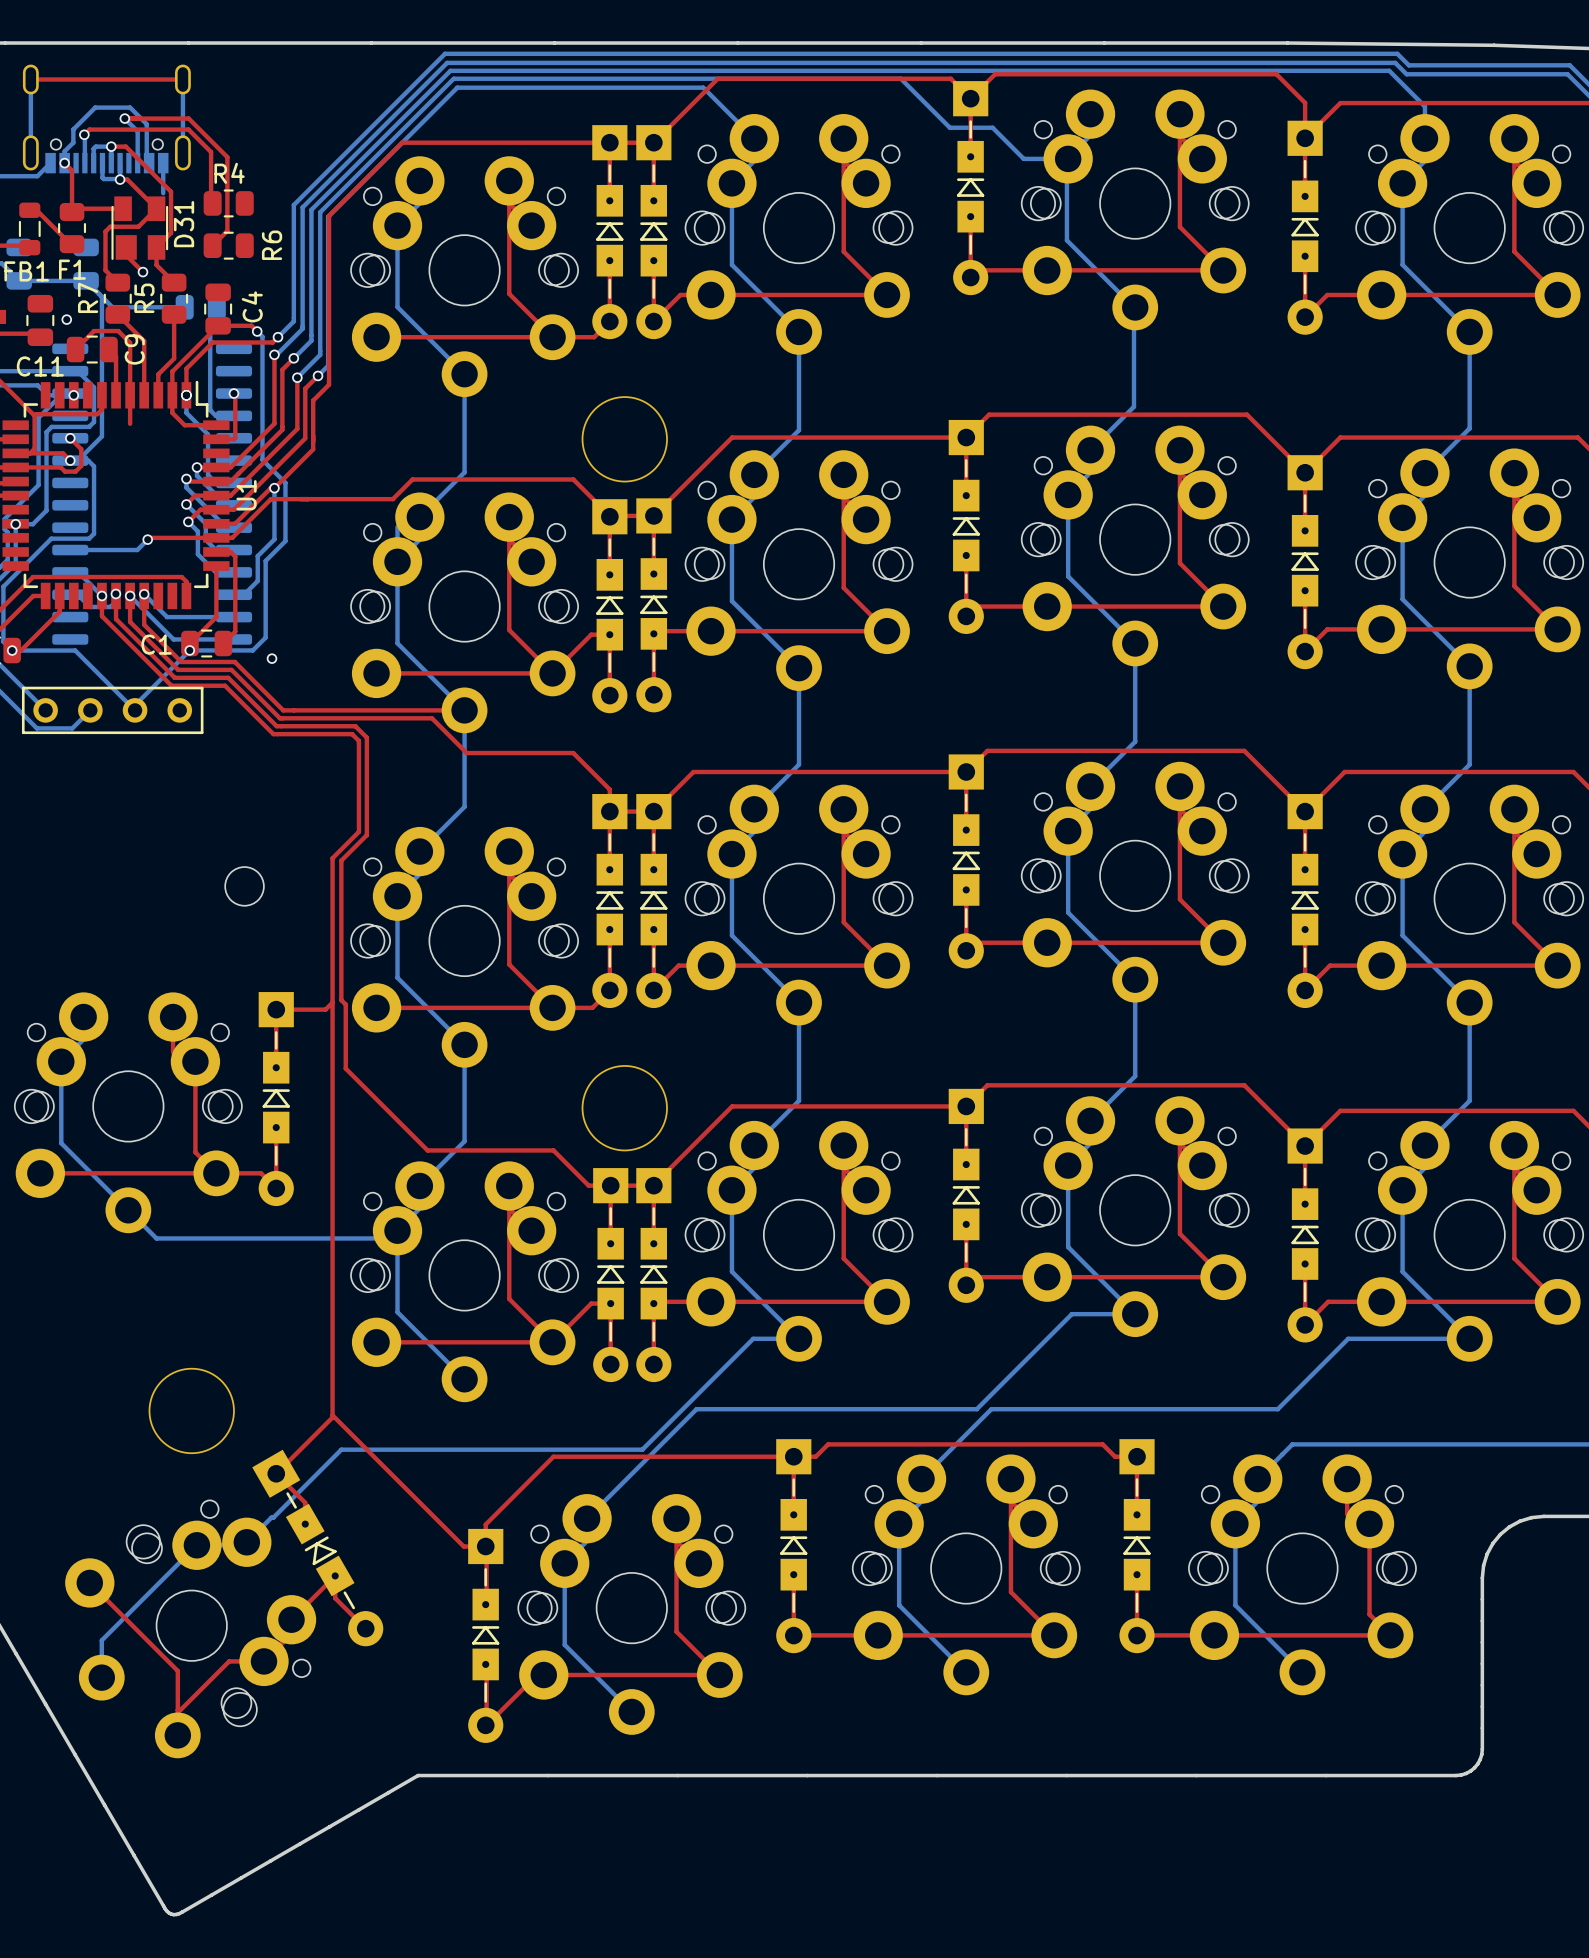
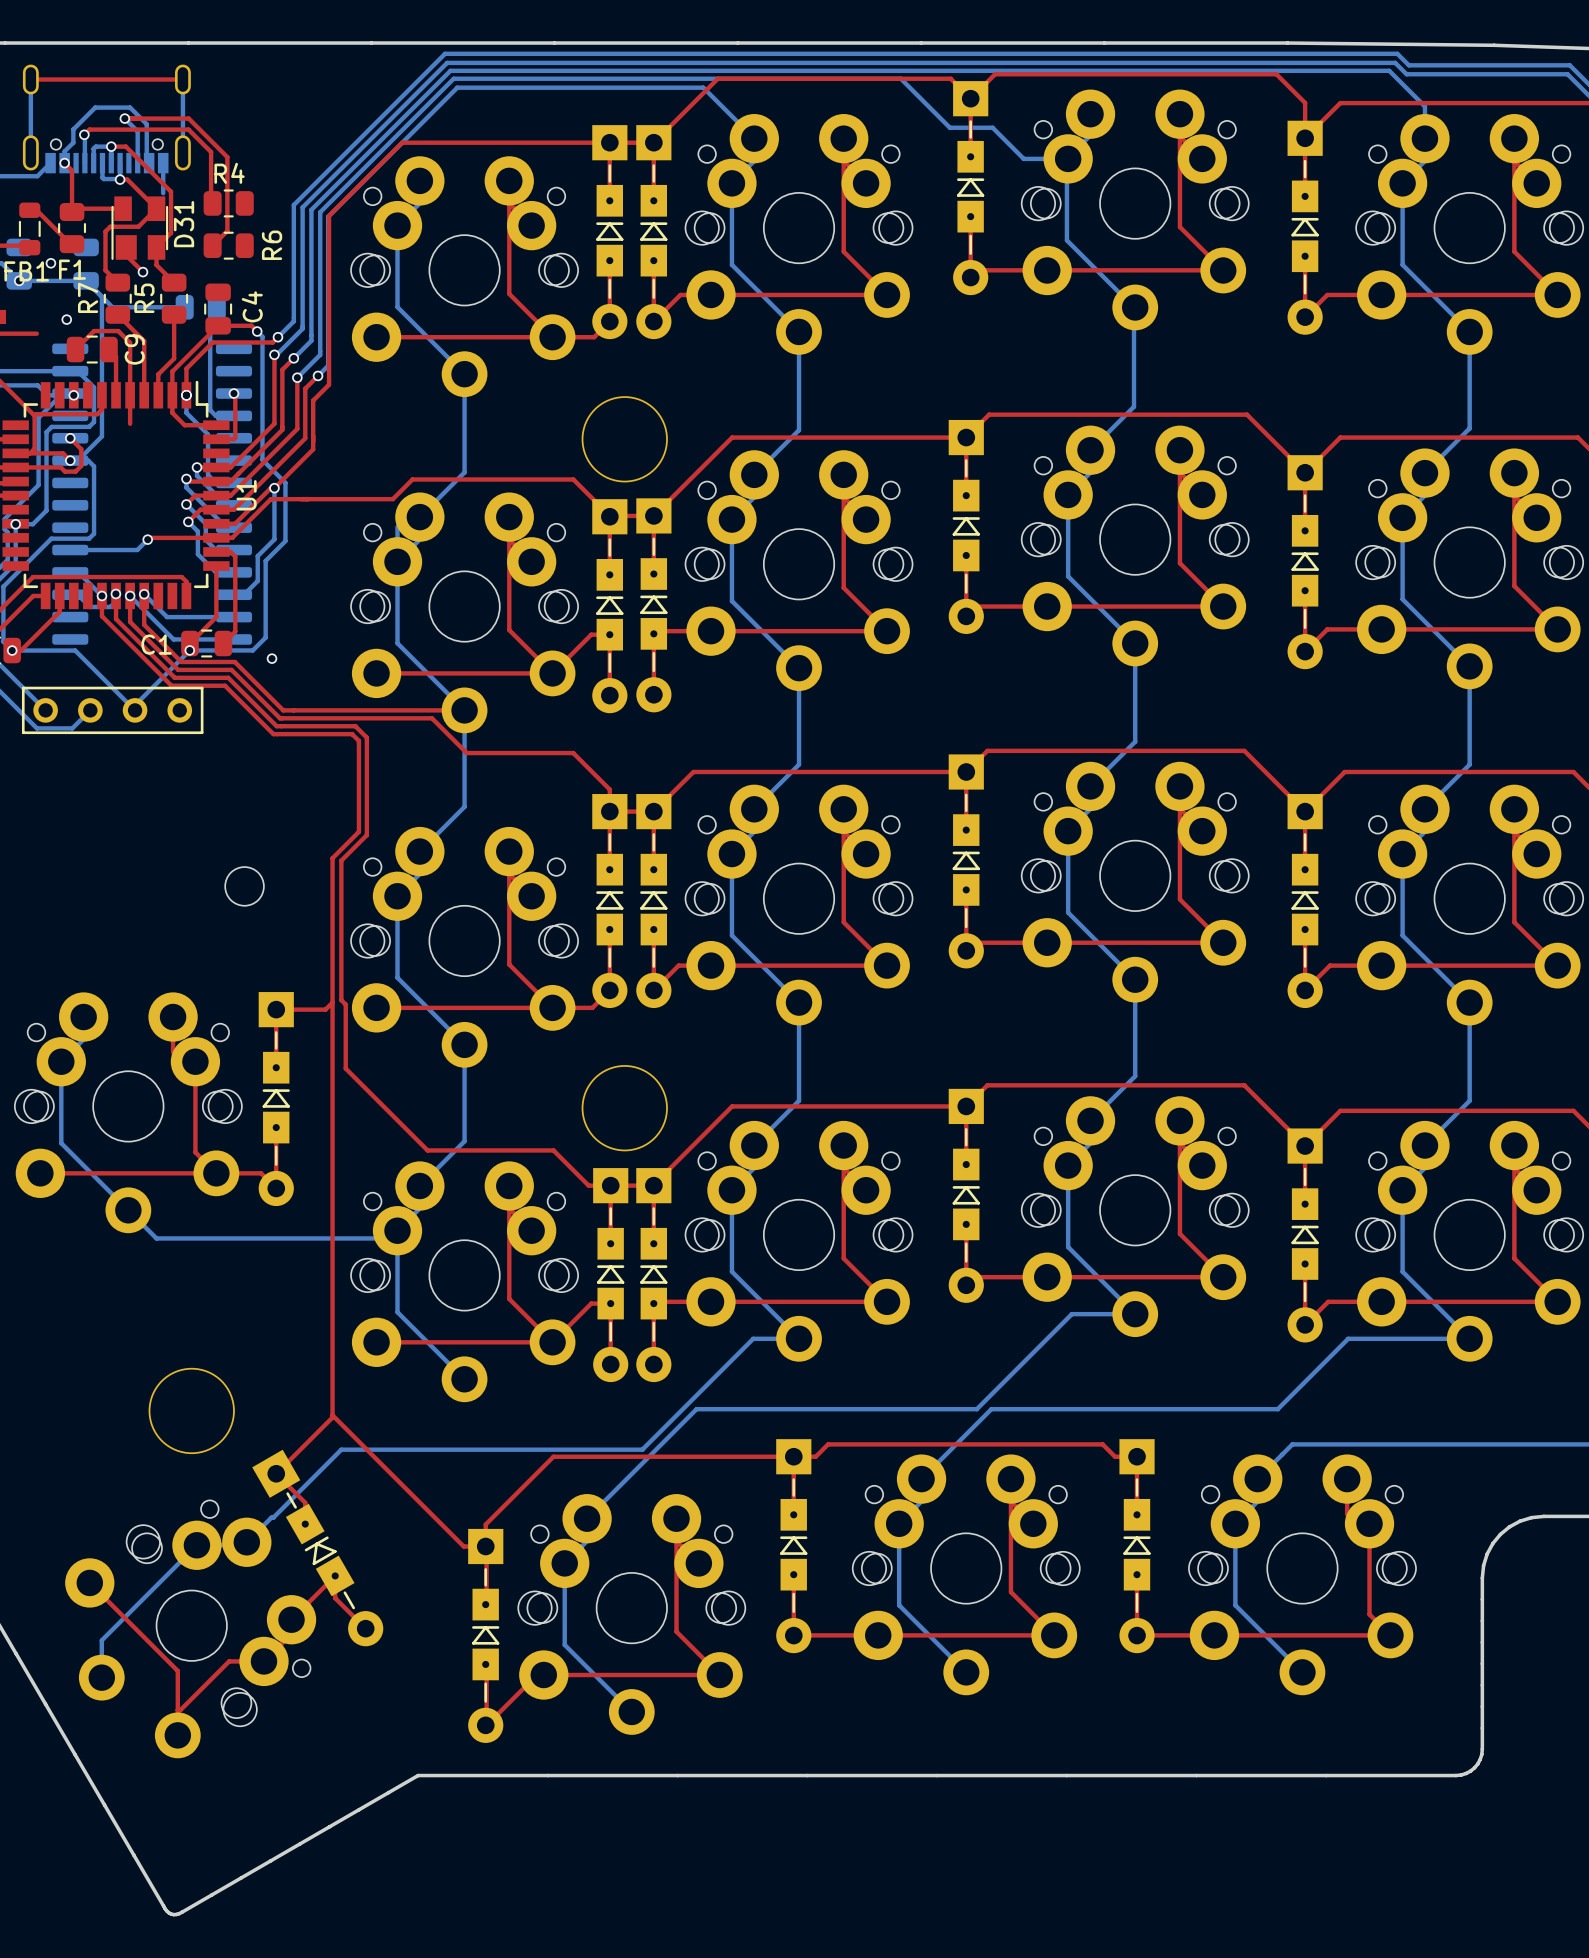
via: none -> (50, 263)
via: none -> (19, 280)
C11: (40, 320) -> none

